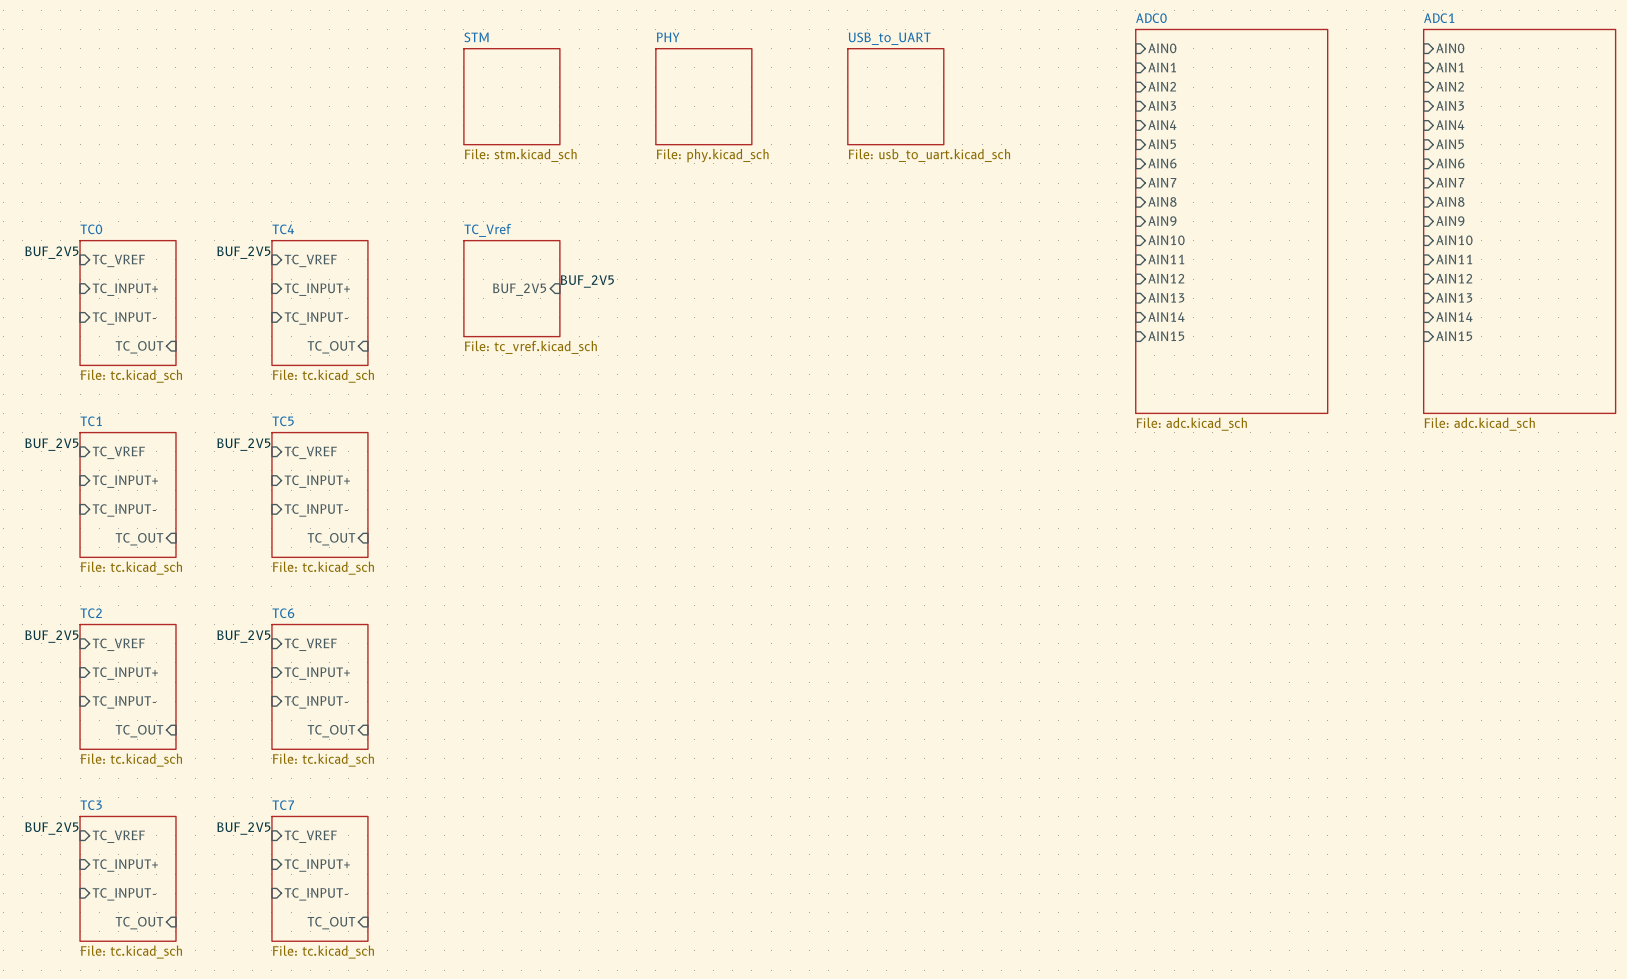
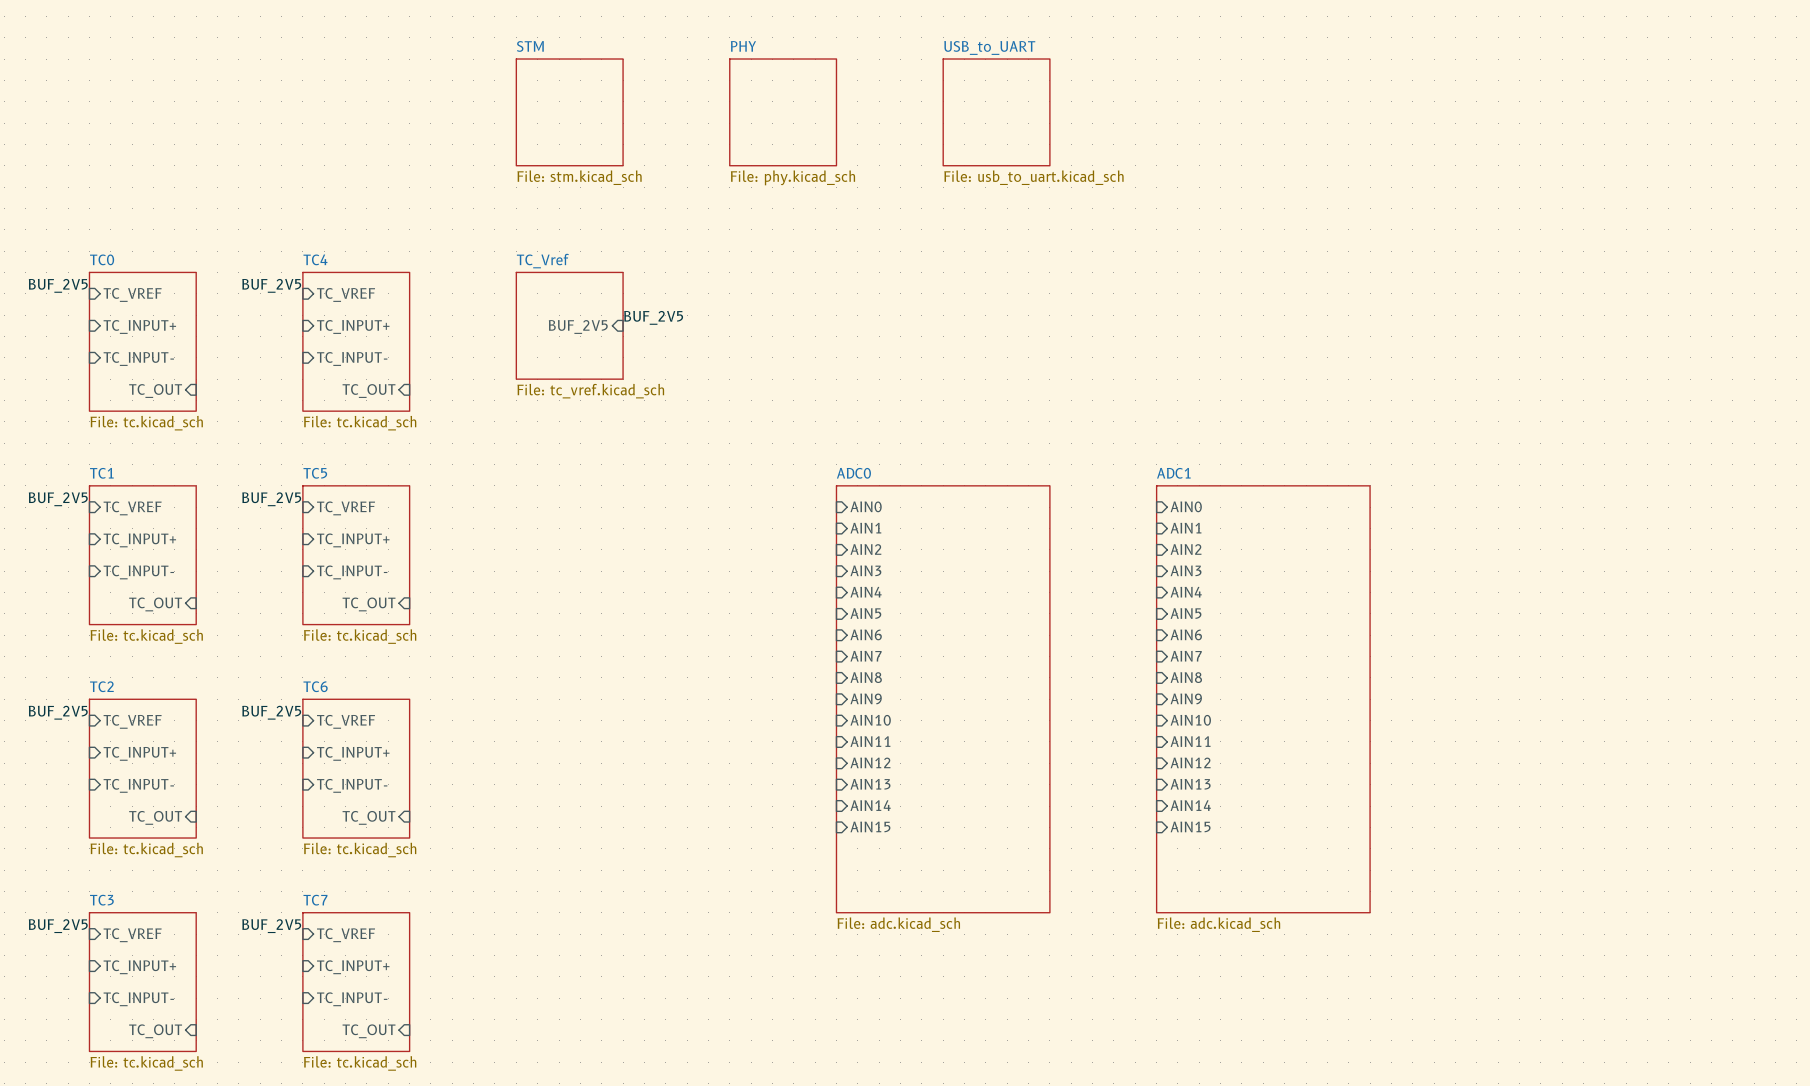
sheet pin: AIN0 (1162, 48) -> none
sheet pin: AIN0 (1450, 48) -> none
sheet pin: AIN1 (1162, 67) -> none
sheet pin: AIN1 (1450, 67) -> none
sheet pin: AIN2 (1162, 86) -> none
sheet pin: AIN2 (1450, 86) -> none
sheet pin: AIN3 (1162, 105) -> none
sheet pin: AIN3 (1450, 105) -> none
sheet pin: AIN4 (1162, 125) -> none
sheet pin: AIN4 (1450, 125) -> none
sheet pin: AIN5 (1162, 144) -> none
sheet pin: AIN5 (1450, 144) -> none
sheet pin: AIN6 (1162, 163) -> none
sheet pin: AIN6 (1450, 163) -> none
sheet pin: AIN7 (1162, 182) -> none
sheet pin: AIN7 (1450, 182) -> none
sheet pin: AIN8 (1162, 201) -> none
sheet pin: AIN8 (1450, 201) -> none
sheet pin: AIN9 (1162, 221) -> none
sheet ADC0 position: (1231, 221) -> (943, 699)
sheet pin: AIN9 (1450, 221) -> none
sheet ADC1 position: (1519, 221) -> (1263, 699)
sheet pin: AIN10 (1166, 240) -> none
sheet pin: AIN10 (1454, 240) -> none
sheet pin: AIN11 (1166, 259) -> none
sheet pin: AIN11 (1454, 259) -> none
sheet pin: AIN12 (1166, 278) -> none
sheet pin: AIN12 (1454, 278) -> none
sheet pin: AIN13 (1166, 297) -> none
sheet pin: AIN13 (1454, 297) -> none
sheet pin: AIN14 (1166, 317) -> none
sheet pin: AIN14 (1454, 317) -> none
sheet pin: AIN15 (1166, 336) -> none
sheet pin: AIN15 (1454, 336) -> none
sheet pin: none -> AIN0 (866, 506)
sheet pin: none -> AIN0 (1186, 506)
sheet pin: none -> AIN1 (865, 528)
sheet pin: none -> AIN1 (1186, 528)
sheet pin: none -> AIN2 (865, 549)
sheet pin: none -> AIN2 (1186, 549)
sheet pin: none -> AIN3 (865, 570)
sheet pin: none -> AIN3 (1186, 570)
sheet pin: none -> AIN4 (866, 592)
sheet pin: none -> AIN4 (1186, 592)
sheet pin: none -> AIN5 (865, 613)
sheet pin: none -> AIN5 (1186, 613)
sheet pin: none -> AIN6 (866, 634)
sheet pin: none -> AIN6 (1186, 634)
sheet pin: none -> AIN7 (866, 656)
sheet pin: none -> AIN7 (1186, 656)
sheet pin: none -> AIN8 (866, 677)
sheet pin: none -> AIN8 (1186, 677)
sheet pin: none -> AIN9 (866, 698)
sheet pin: none -> AIN9 (1186, 698)
sheet pin: none -> AIN10 (870, 720)
sheet pin: none -> AIN10 (1190, 720)
sheet pin: none -> AIN11 (870, 741)
sheet pin: none -> AIN11 (1190, 741)
sheet pin: none -> AIN12 (870, 762)
sheet pin: none -> AIN12 (1190, 762)
sheet pin: none -> AIN13 (870, 784)
sheet pin: none -> AIN13 (1190, 784)
sheet pin: none -> AIN14 (870, 805)
sheet pin: none -> AIN14 (1190, 805)
sheet pin: none -> AIN15 (870, 826)
sheet pin: none -> AIN15 (1190, 826)

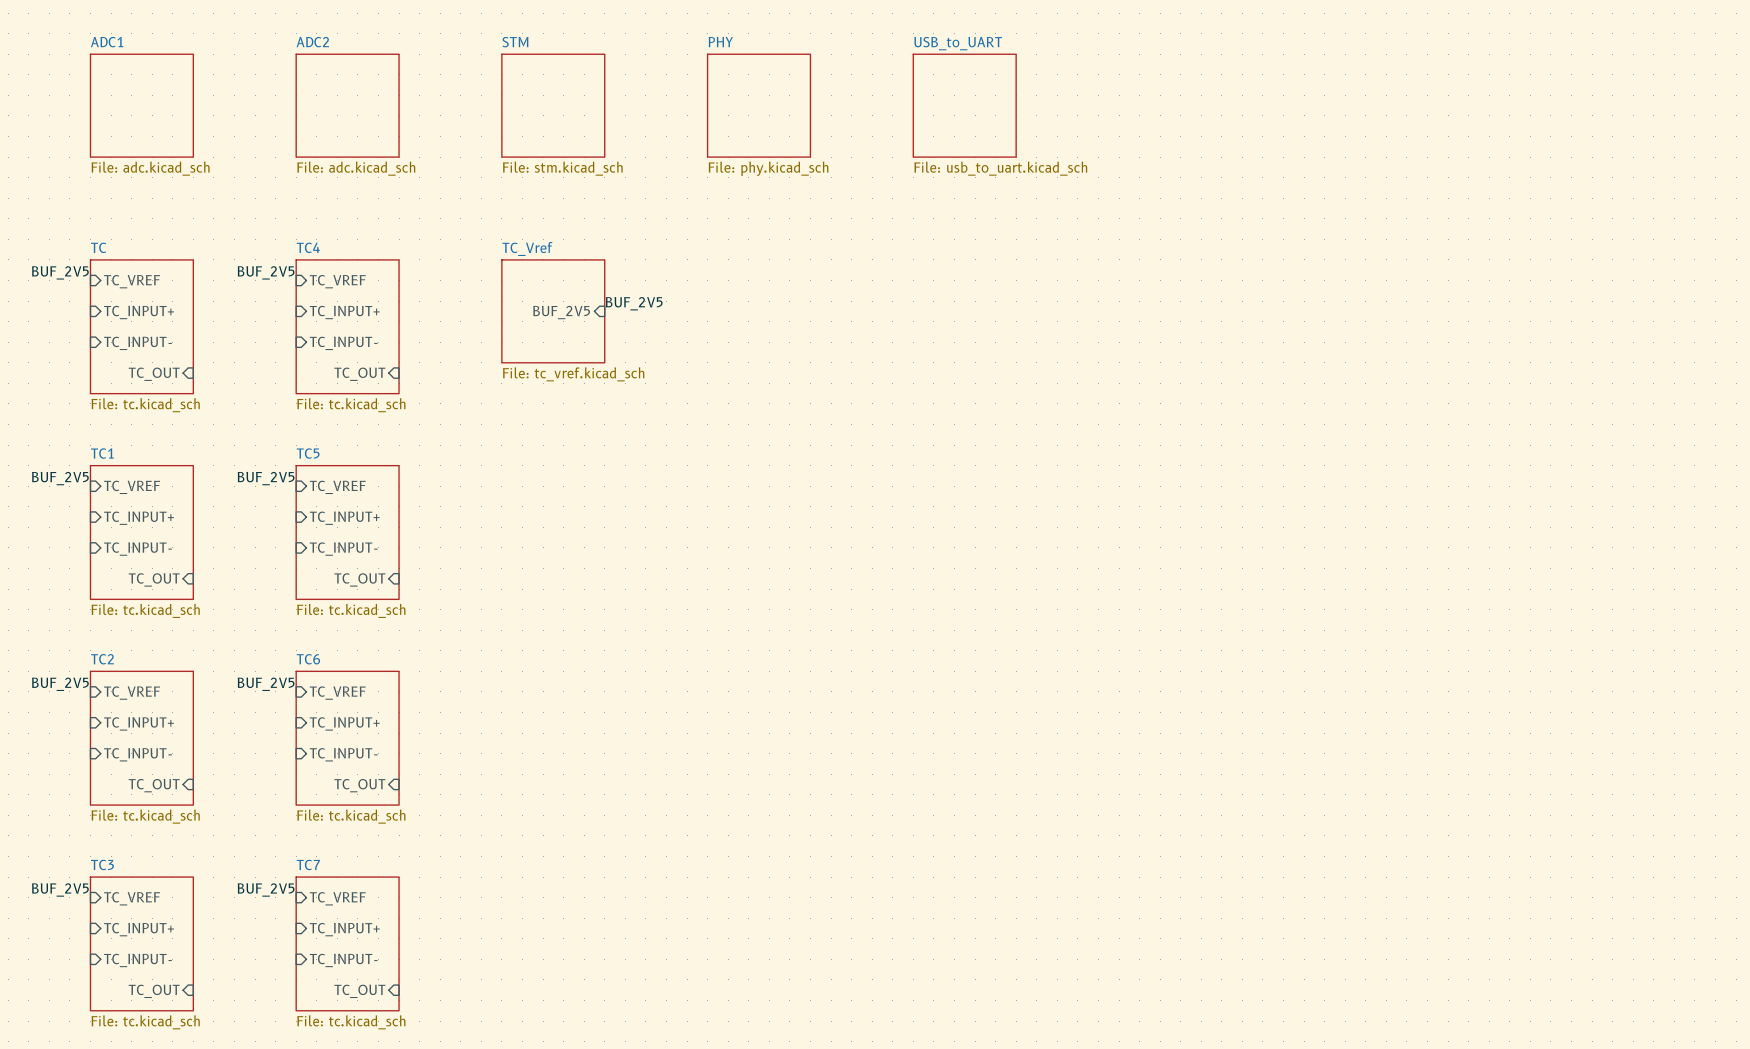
sheet ADC2: none -> File: adc.kicad_sch (347, 105)
sheet TC0 name: TC0 (102, 259) -> TC (98, 247)
sheet ADC1 name position: ADC1 (1173, 473) -> ADC1 (107, 42)
sheet ADC1 shape: [1155, 485, 1371, 914] -> [89, 53, 194, 158]
sheet pin: AIN0 (866, 506) -> none
sheet pin: AIN0 (1186, 506) -> none
sheet pin: AIN1 (865, 528) -> none
sheet pin: AIN1 (1186, 528) -> none
sheet pin: AIN2 (865, 549) -> none
sheet pin: AIN2 (1186, 549) -> none
sheet pin: AIN3 (865, 570) -> none
sheet pin: AIN3 (1186, 570) -> none
sheet pin: AIN4 (866, 592) -> none
sheet pin: AIN4 (1186, 592) -> none
sheet pin: AIN5 (865, 613) -> none
sheet pin: AIN5 (1186, 613) -> none
sheet pin: AIN6 (866, 634) -> none
sheet pin: AIN6 (1186, 634) -> none
sheet pin: AIN7 (866, 656) -> none
sheet pin: AIN7 (1186, 656) -> none
sheet pin: AIN8 (866, 677) -> none
sheet pin: AIN8 (1186, 677) -> none
sheet pin: AIN9 (866, 698) -> none
sheet pin: AIN9 (1186, 698) -> none
sheet ADC0: File: adc.kicad_sch (943, 699) -> none
sheet pin: AIN10 (870, 720) -> none
sheet pin: AIN10 (1190, 720) -> none
sheet pin: AIN11 (870, 741) -> none
sheet pin: AIN11 (1190, 741) -> none
sheet pin: AIN12 (870, 762) -> none
sheet pin: AIN12 (1190, 762) -> none
sheet pin: AIN13 (870, 784) -> none
sheet pin: AIN13 (1190, 784) -> none
sheet pin: AIN14 (870, 805) -> none
sheet pin: AIN14 (1190, 805) -> none
sheet pin: AIN15 (870, 826) -> none
sheet pin: AIN15 (1190, 826) -> none
sheet ADC1 value position: File: adc.kicad_sch (1218, 924) -> File: adc.kicad_sch (150, 168)

